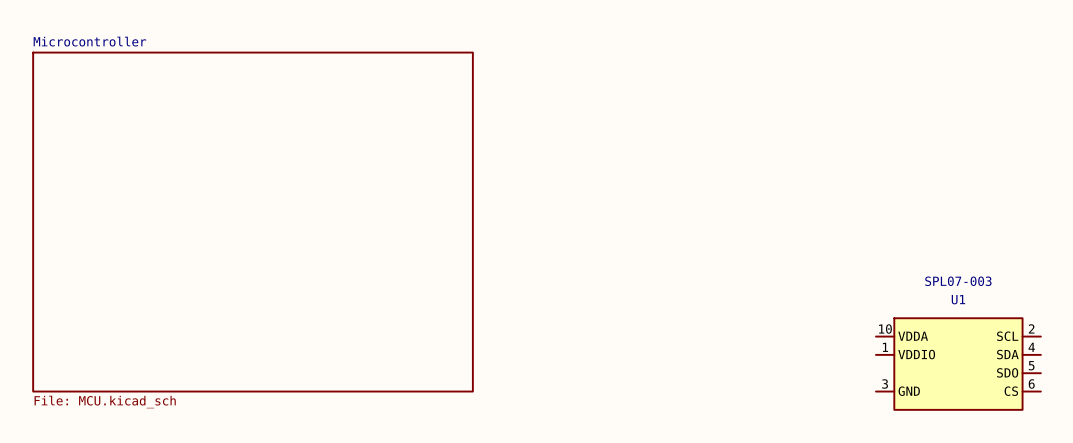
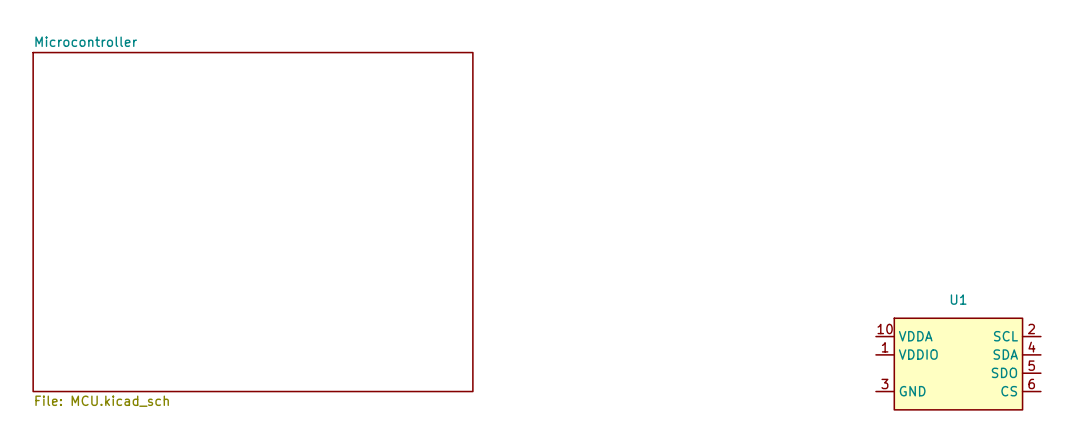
U1 value: SPL07-003 (958, 281) -> none

